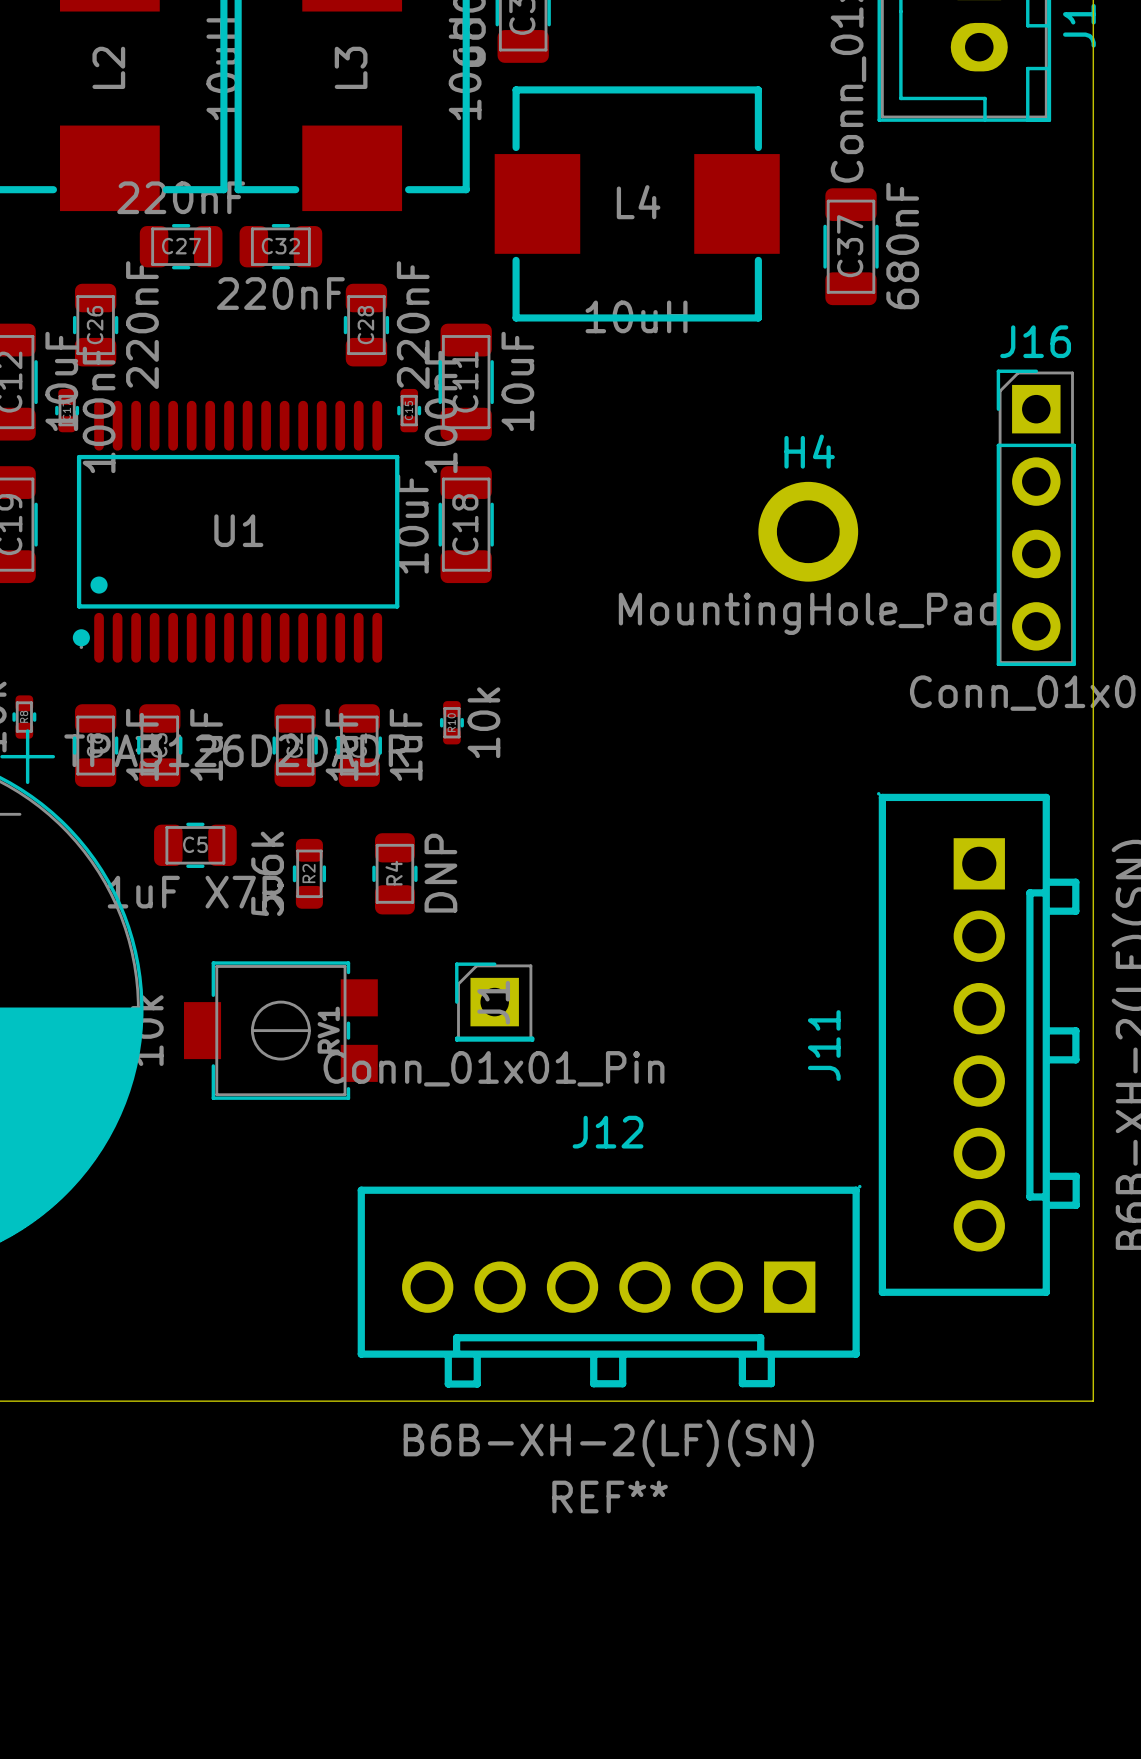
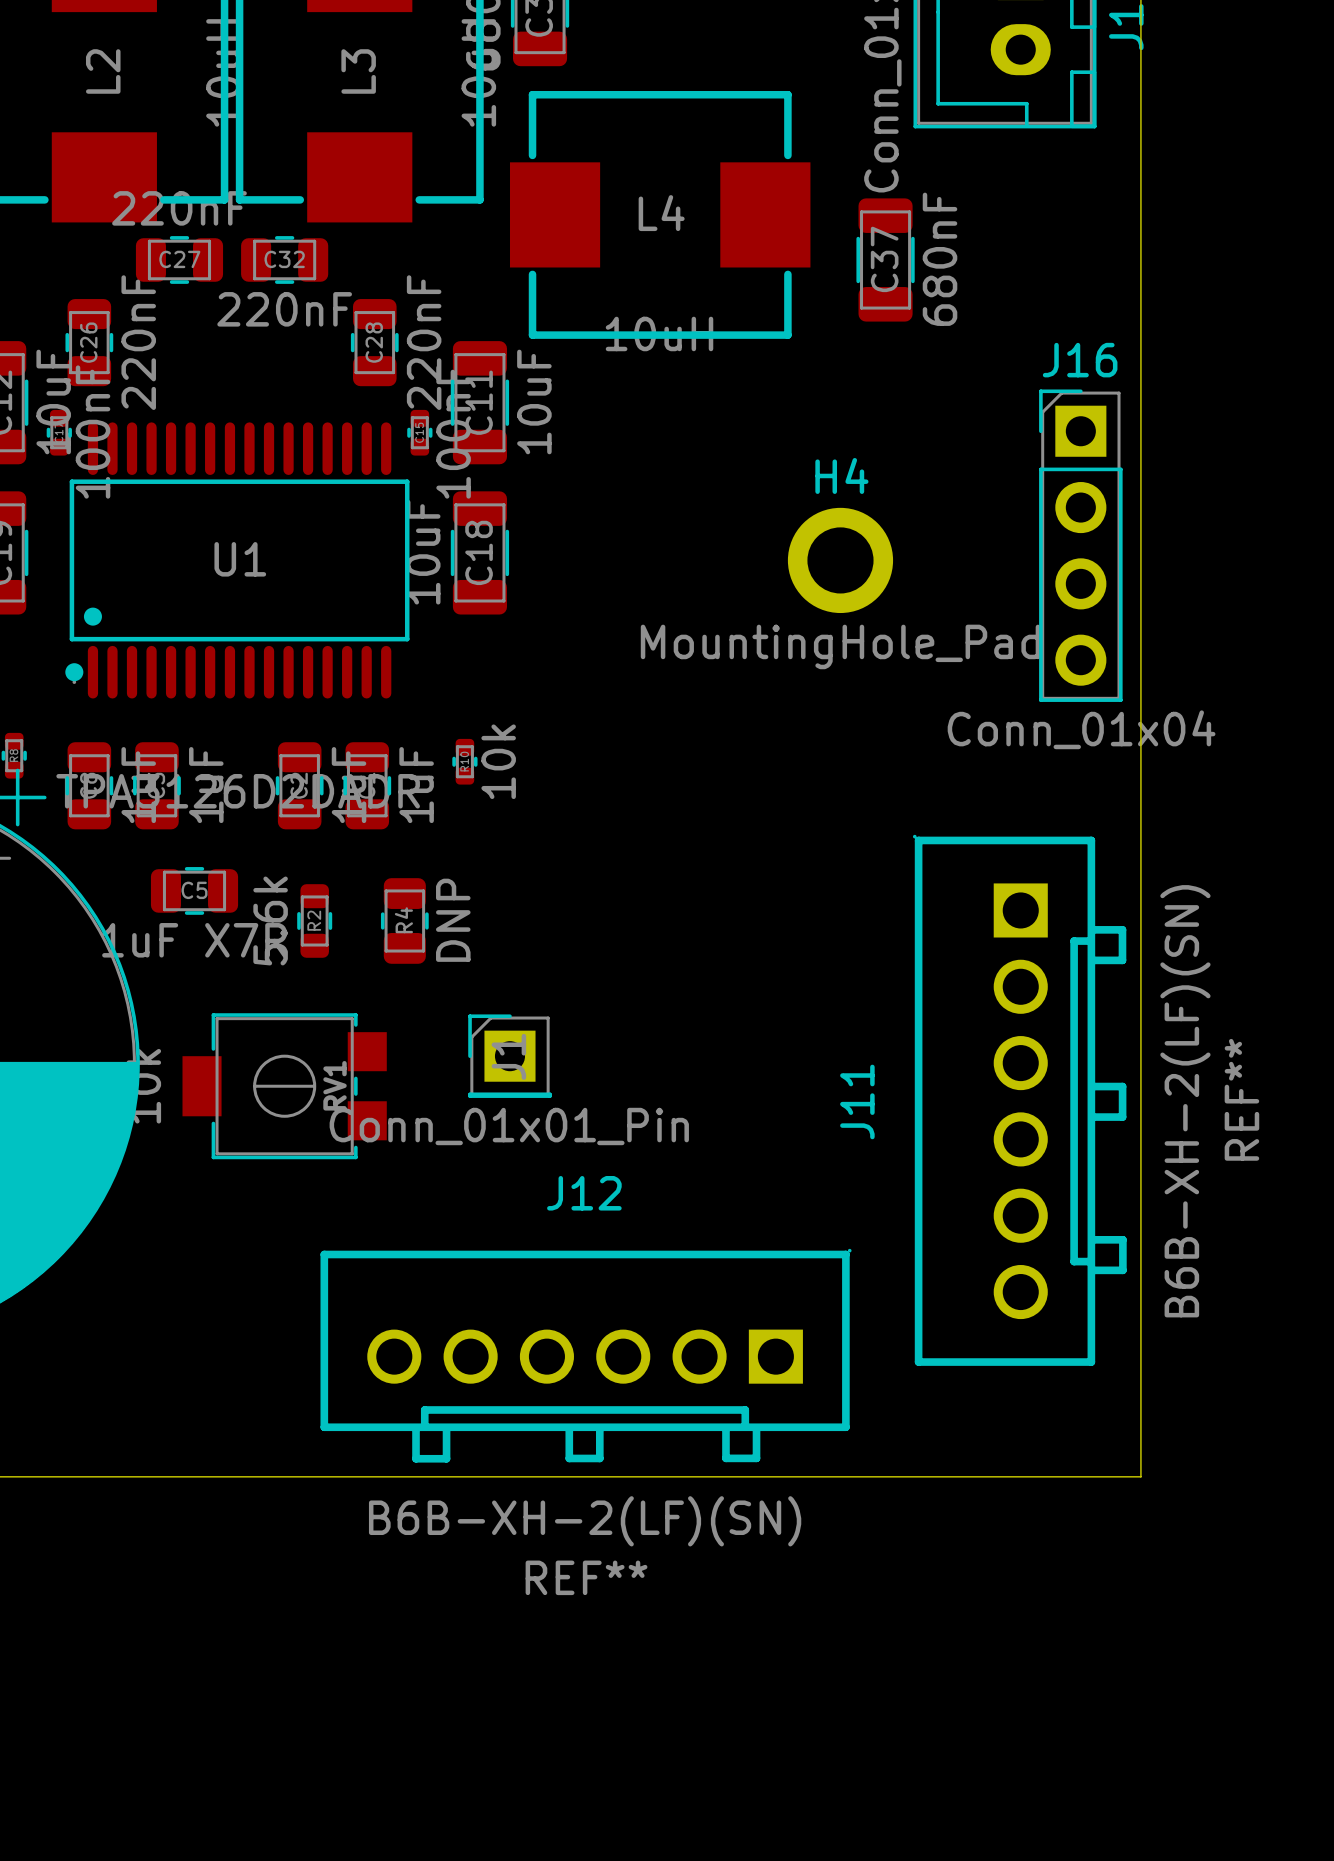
J12 position: (609, 1286) -> (586, 1355)

